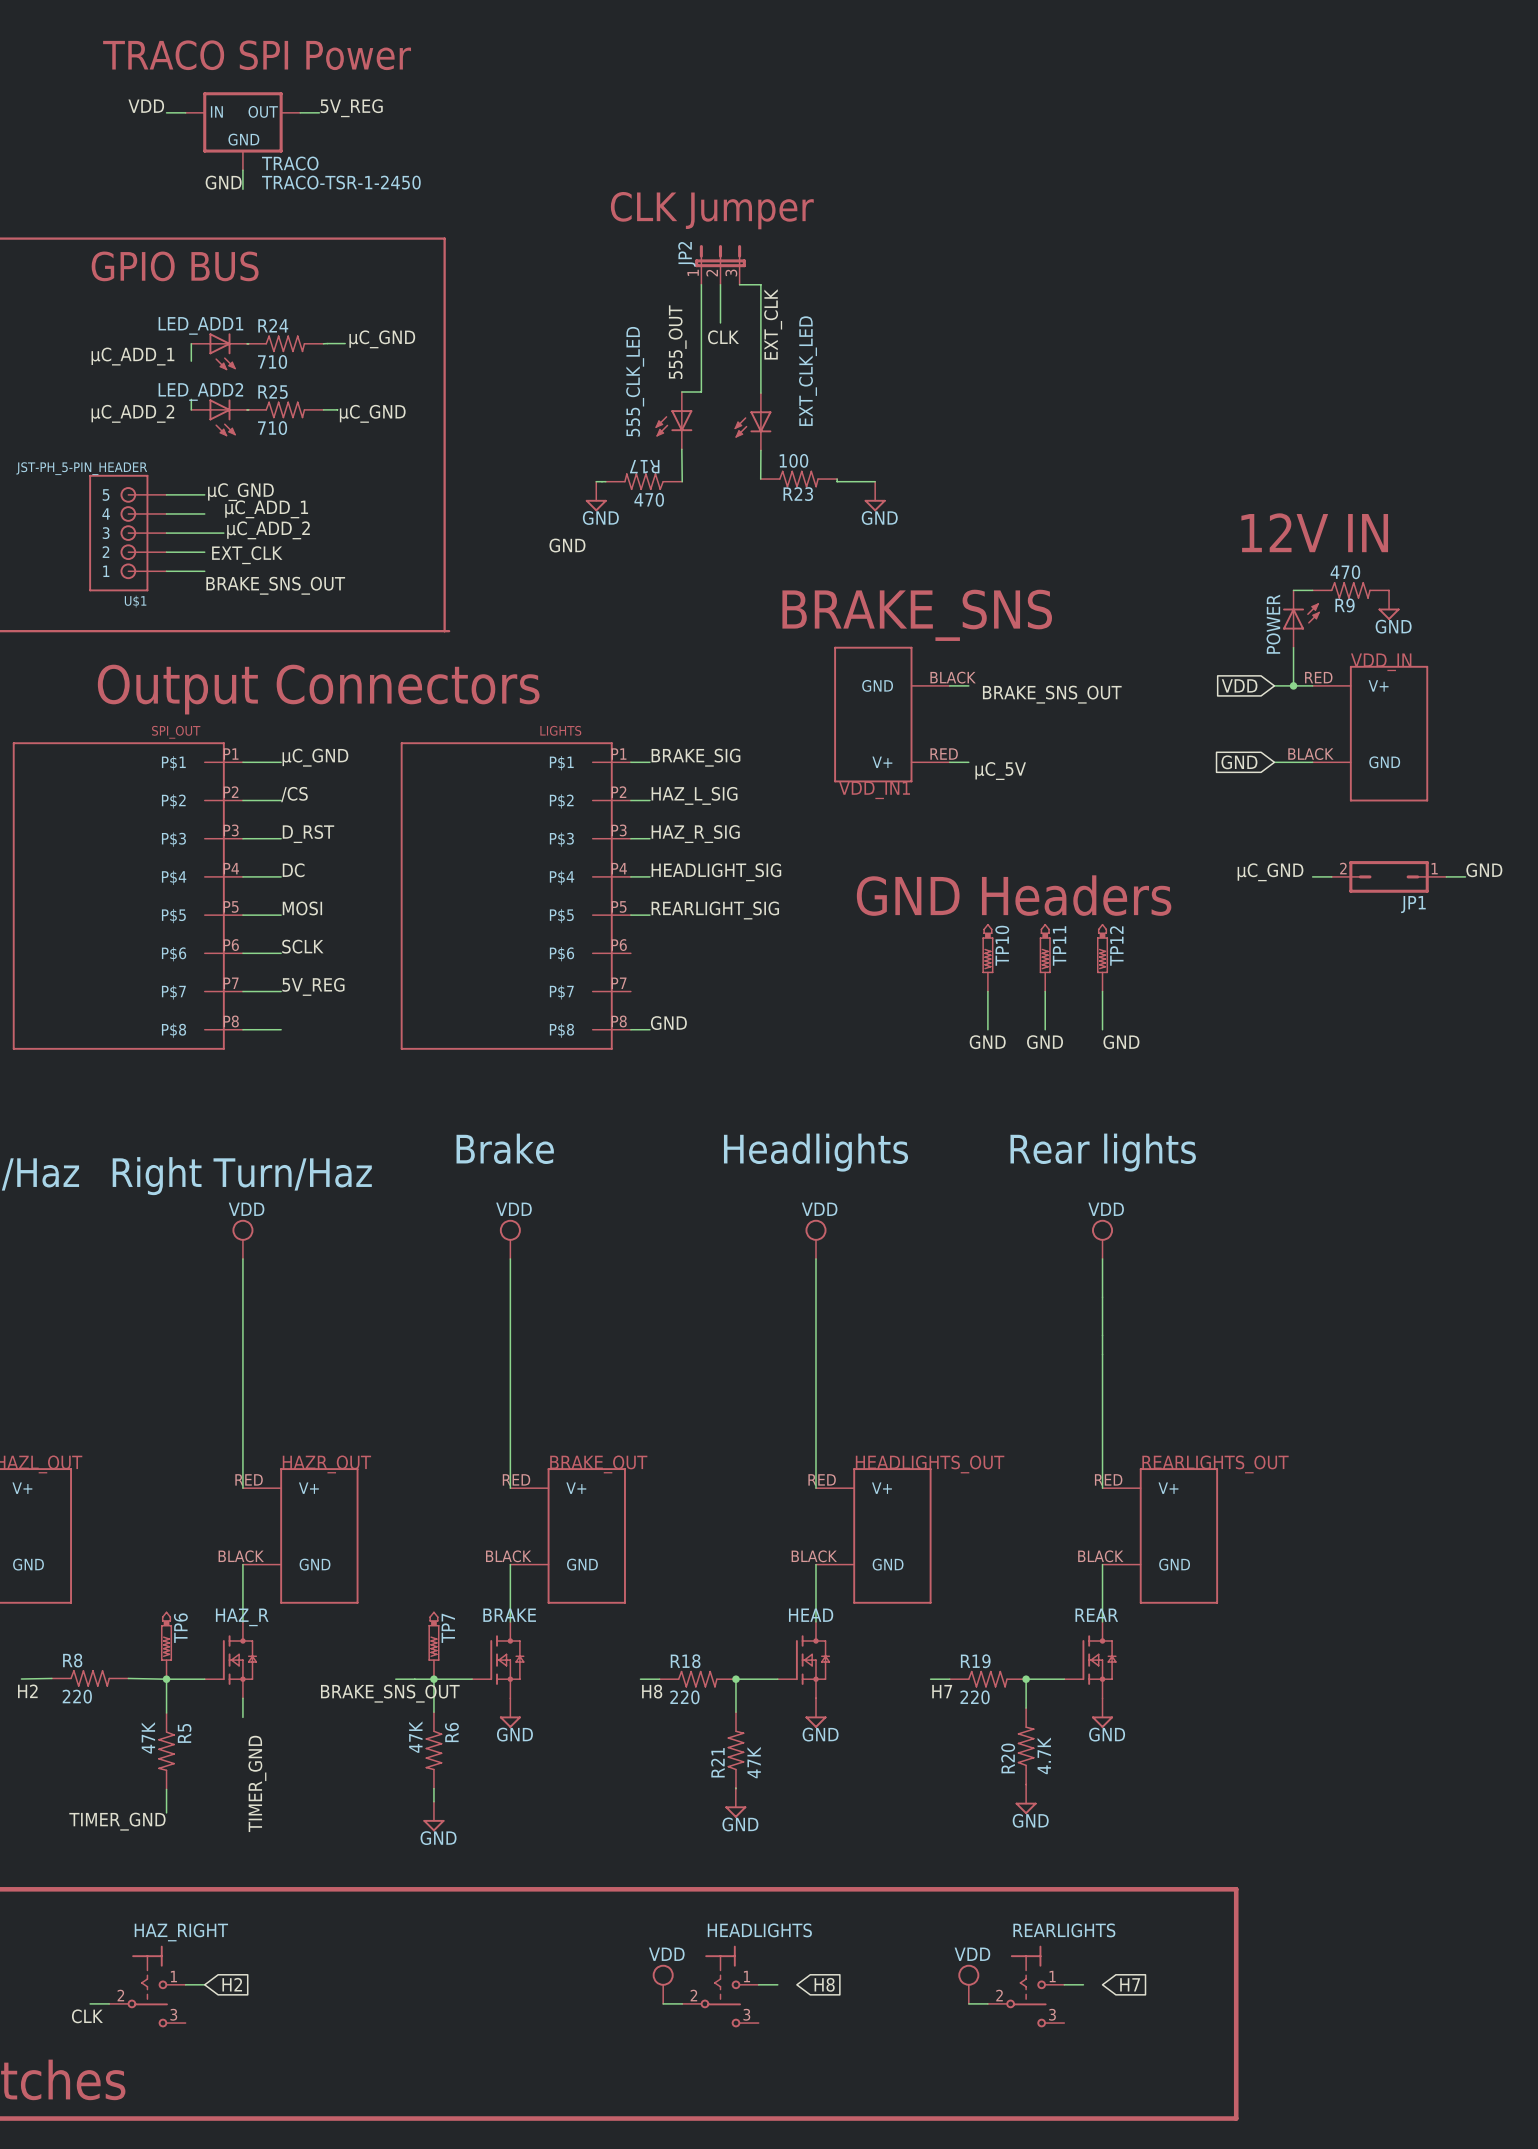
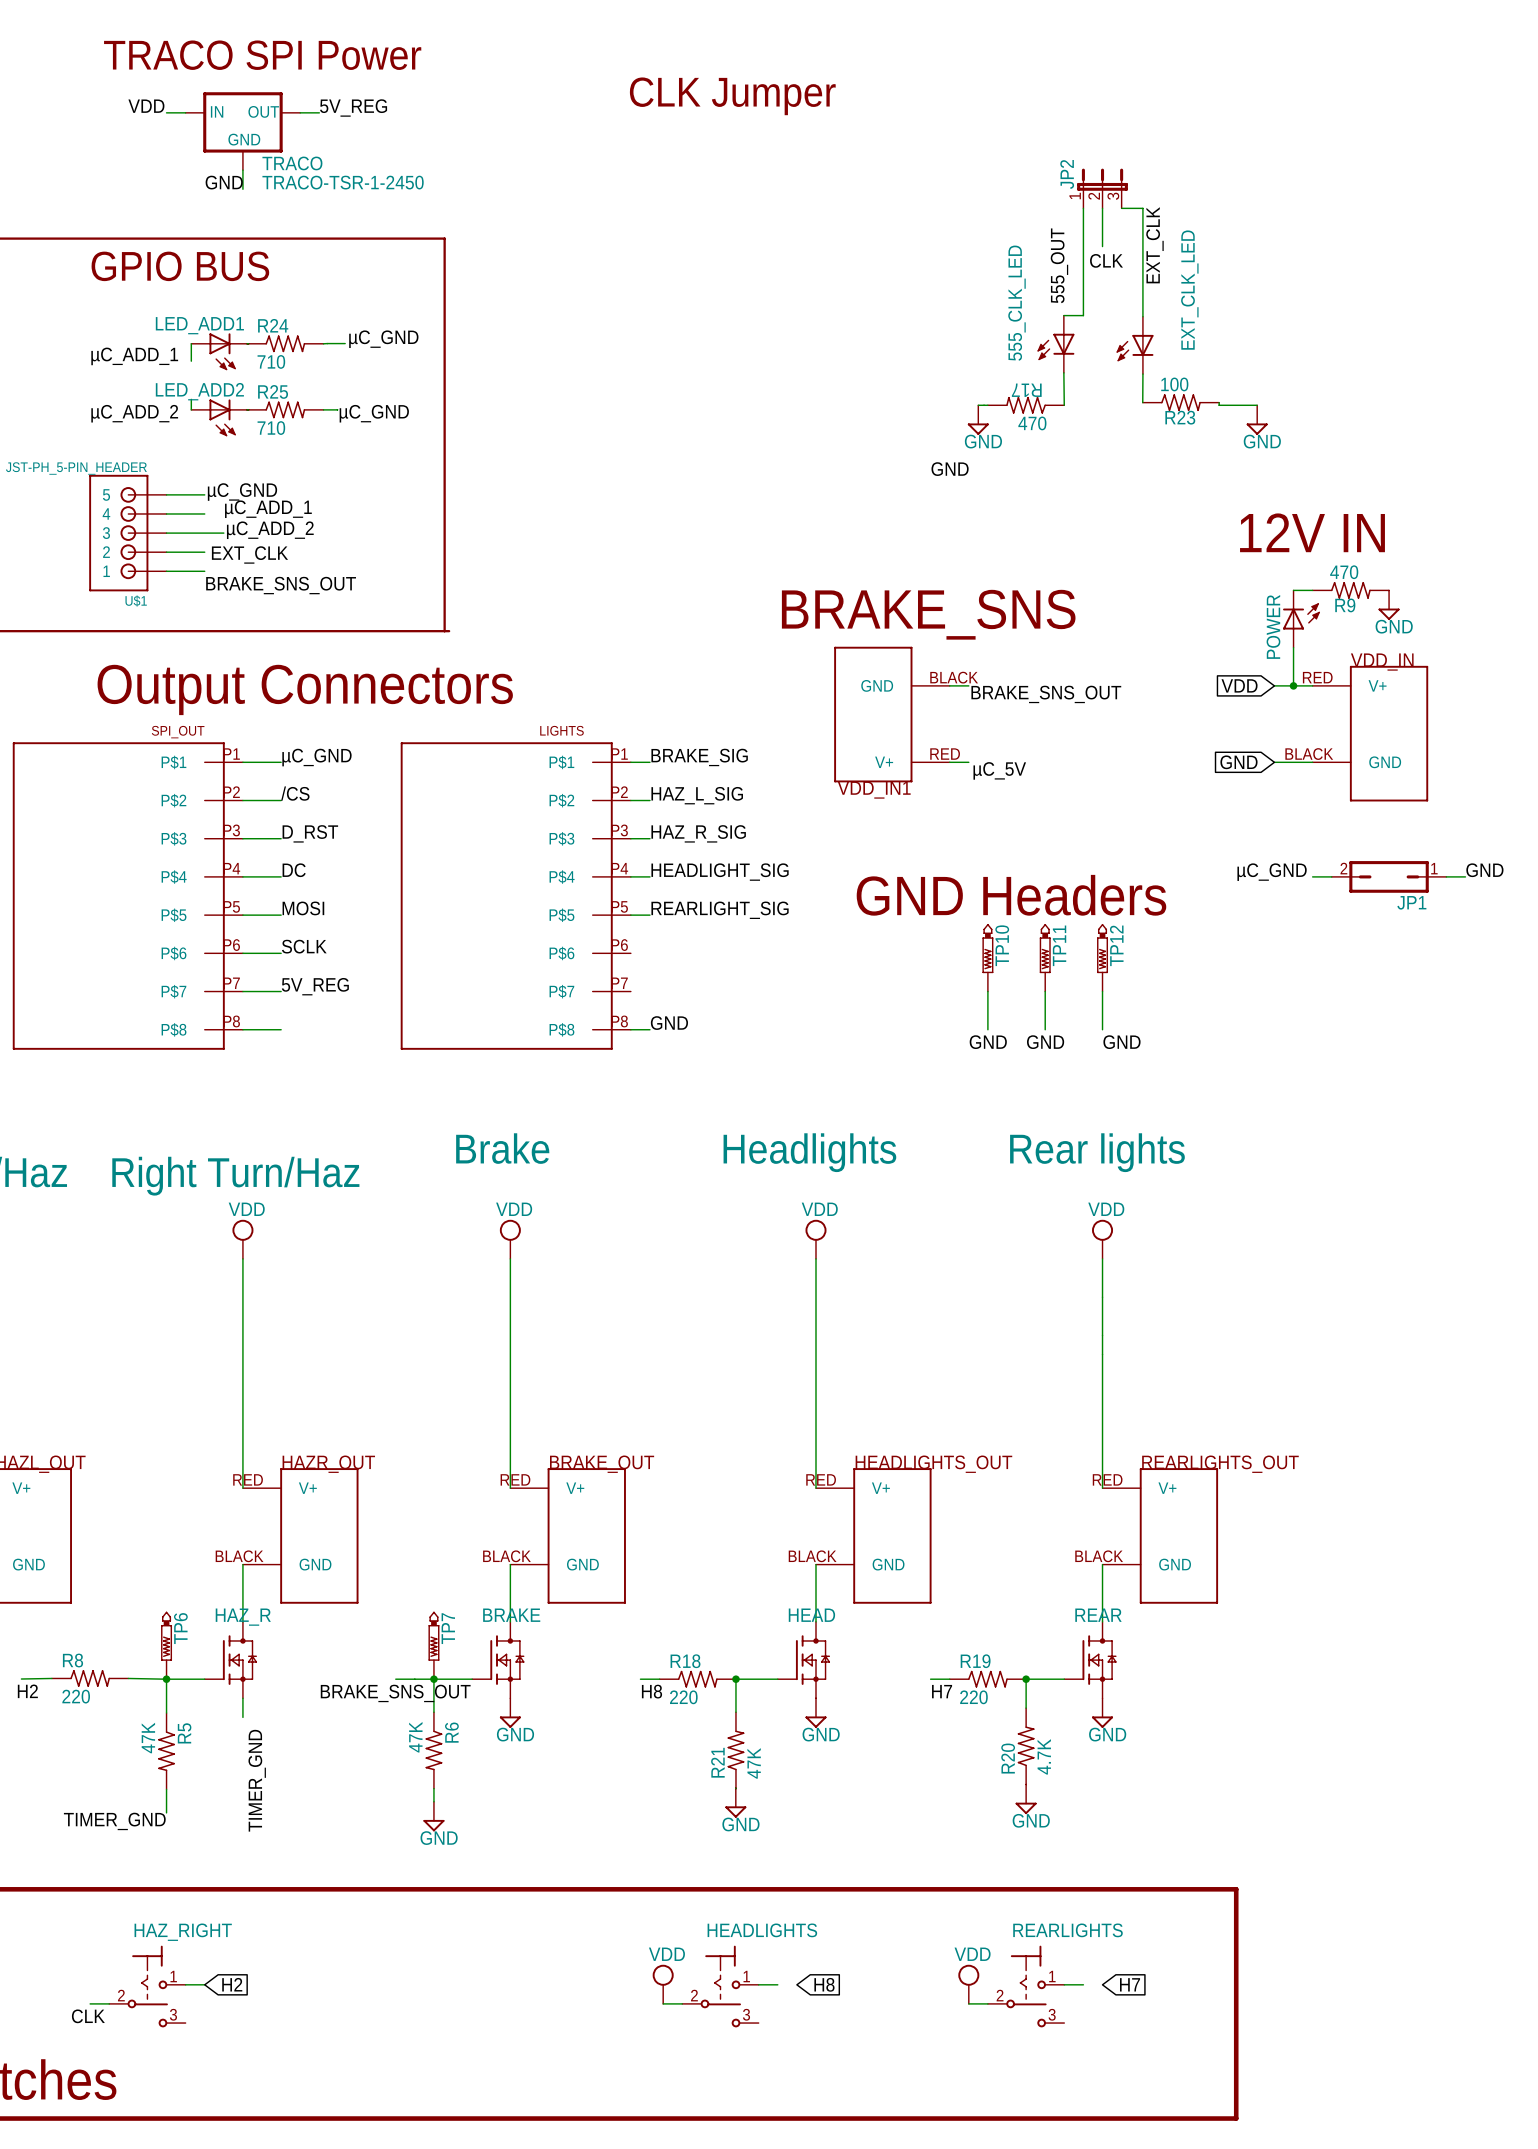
wire: none -> (1083, 208) (1083, 315) (1063, 315)
wire: none -> (1102, 208) (1102, 246)
wire: none -> (1121, 208) (1142, 208) (1142, 316)
text position: CLK Jumper (712, 210) -> CLK Jumper (732, 96)
label: none -> EXT_CLK (1154, 245)
label: none -> CLK (1106, 260)
JP2 position: (720, 264) -> (1102, 188)
label: none -> 555_OUT (1059, 265)
wire: (701, 284) (701, 392) (681, 392) -> none
wire: (720, 284) (720, 322) -> none
wire: (739, 284) (760, 284) (760, 393) -> none
label: EXT_CLK (773, 324) -> none
label: CLK (723, 337) -> none
label: 555_OUT (677, 342) -> none
EXT_CLK_LED: none -> (1135, 345)
wire: none -> (1063, 372) (1064, 405)
wire: none -> (1142, 374) (1142, 402)
wire: none -> (1219, 402) (1219, 405) (1257, 405)
wire: none -> (978, 405) (987, 405)
555_CLK_LED position: (673, 420) -> (1055, 344)
power symbol: none -> GND (1257, 420)
EXT_CLK_LED: (752, 421) -> none
wire: (681, 449) (682, 481) -> none
wire: (760, 450) (760, 479) -> none
label: none -> GND (950, 469)
R23 position: (798, 479) -> (1180, 402)
wire: (837, 479) (837, 481) (875, 481) -> none
wire: (596, 481) (605, 481) -> none
R17 position: (644, 481) -> (1026, 405)
power symbol: GND (596, 496) -> none
power symbol position: GND (875, 496) -> GND (978, 420)
label: GND (567, 545) -> none

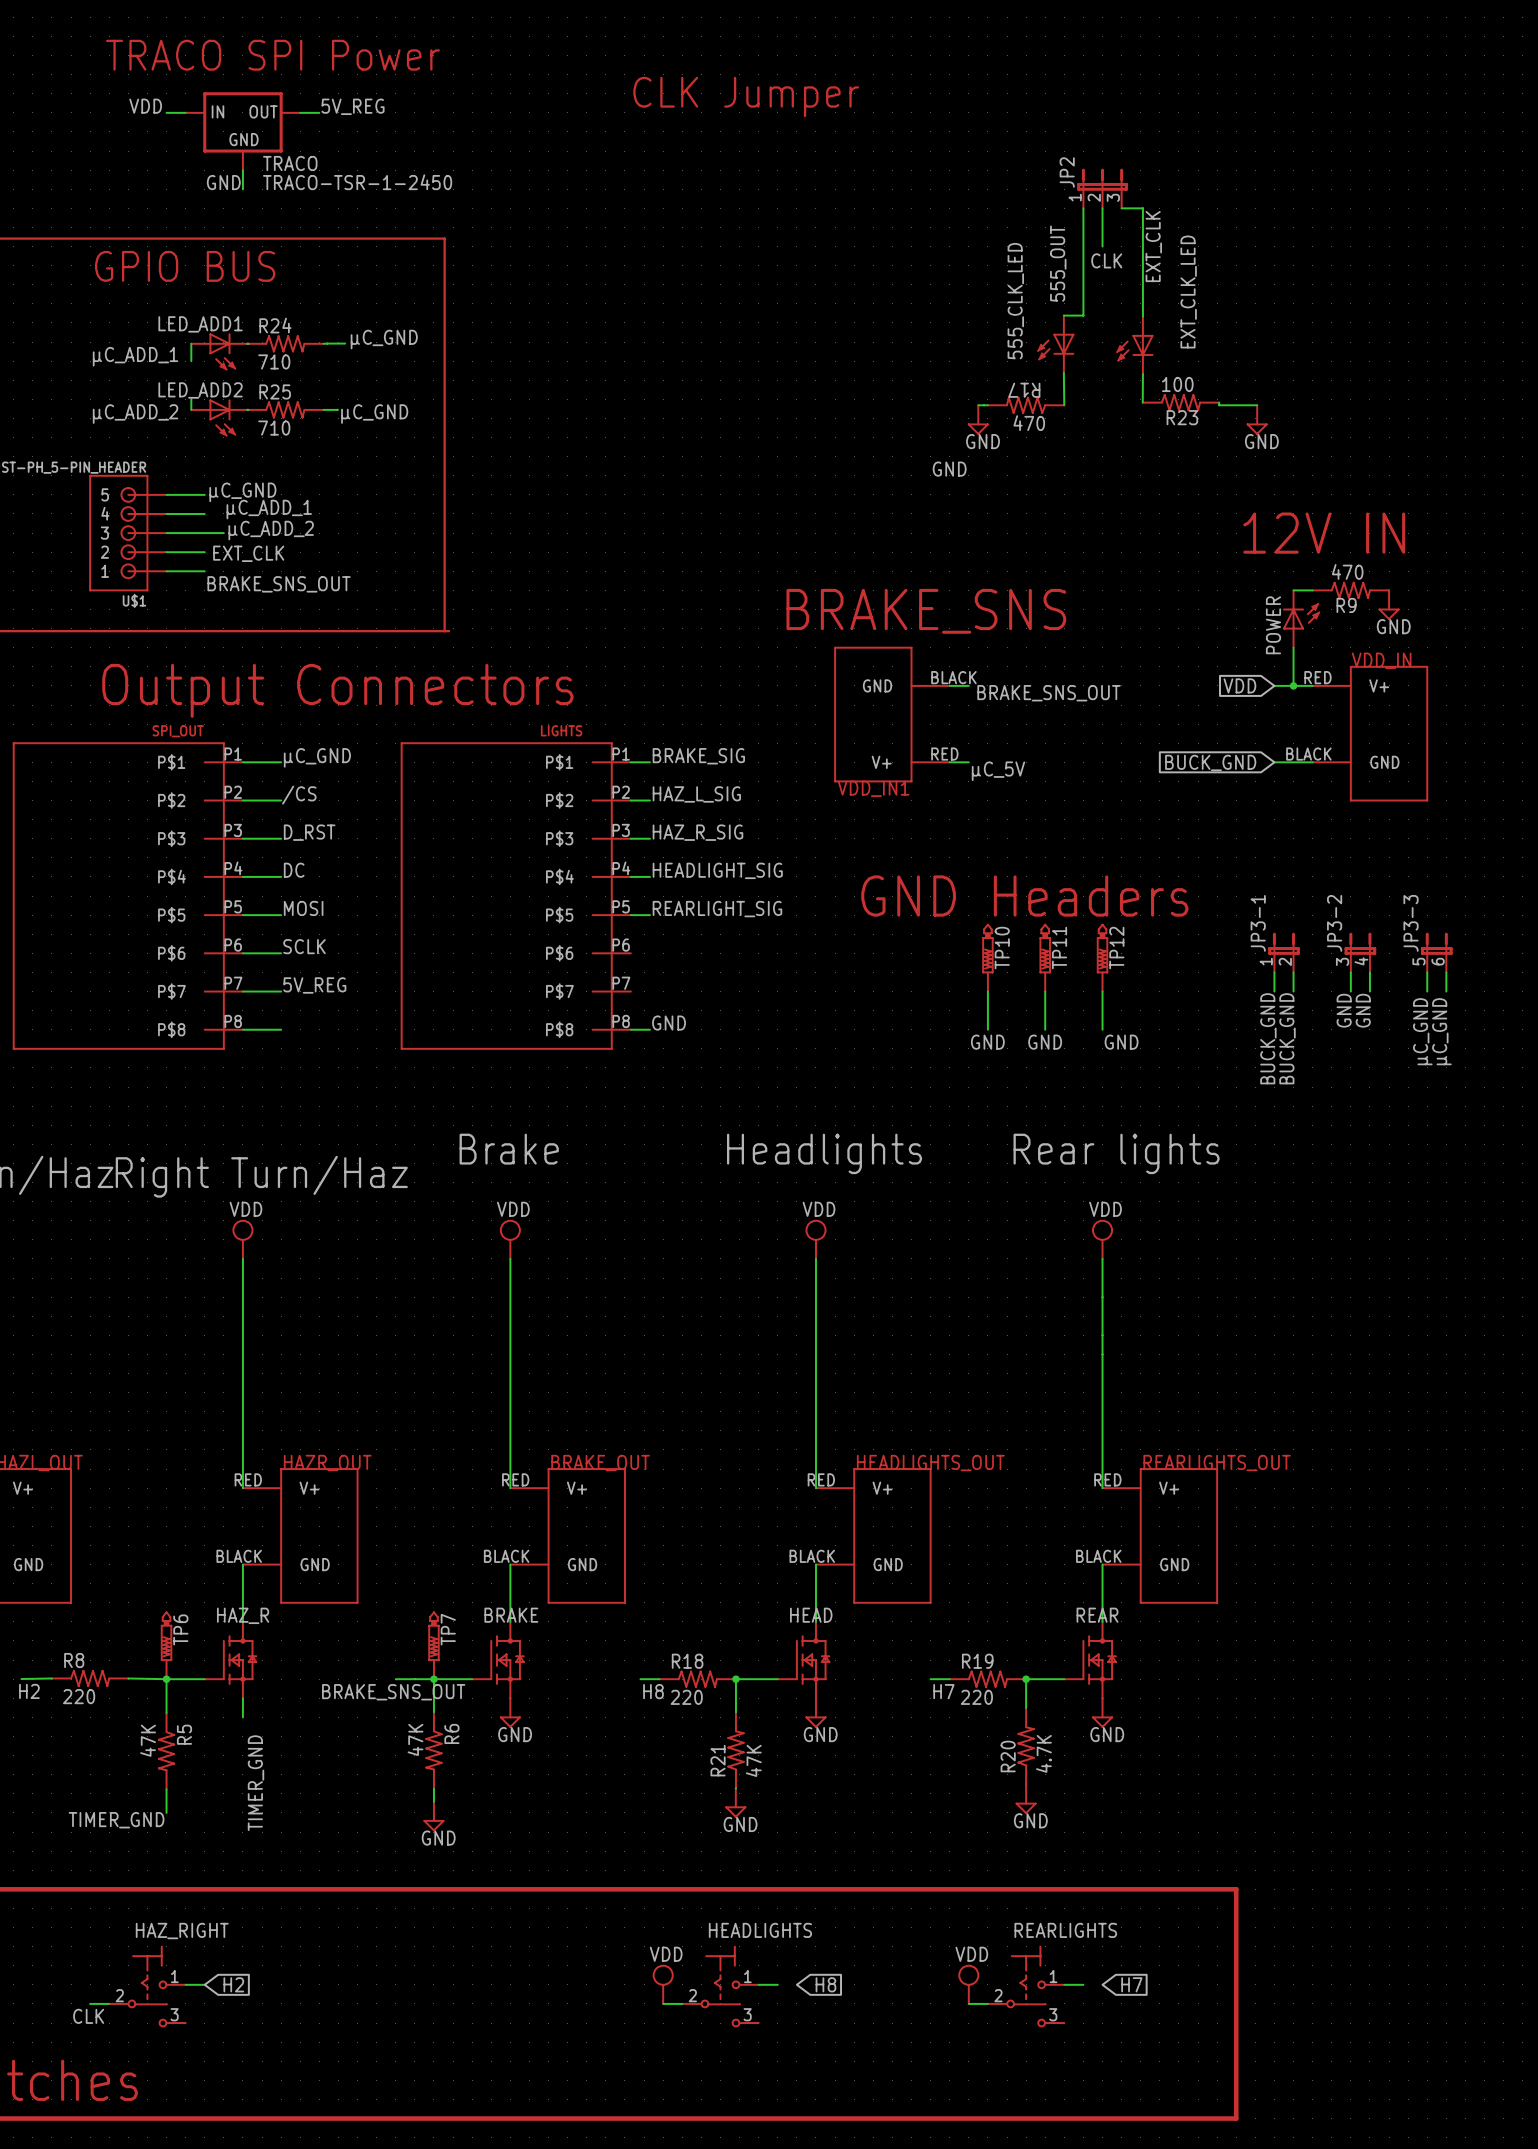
global label: GND (1238, 762) -> BUCK_GND (1210, 762)
label: GND (1484, 870) -> none
label: µC_GND (1272, 872) -> none
wire: (1312, 876) (1331, 876) -> none
JP1: (1389, 876) -> none
wire: (1446, 876) (1465, 876) -> none
JP3-1: none -> (1283, 952)
JP3-2: none -> (1360, 952)
JP3-3: none -> (1436, 952)
wire: none -> (1274, 972) (1274, 991)
wire: none -> (1293, 972) (1293, 991)
wire: none -> (1350, 972) (1350, 991)
wire: none -> (1369, 972) (1369, 991)
wire: none -> (1427, 972) (1427, 991)
wire: none -> (1446, 972) (1446, 991)
label: none -> GND (1344, 1010)
label: none -> GND (1363, 1010)
label: none -> µC_GND (1422, 1031)
label: none -> µC_GND (1441, 1031)
label: none -> BUCK_GND (1268, 1038)
label: none -> BUCK_GND (1287, 1038)

